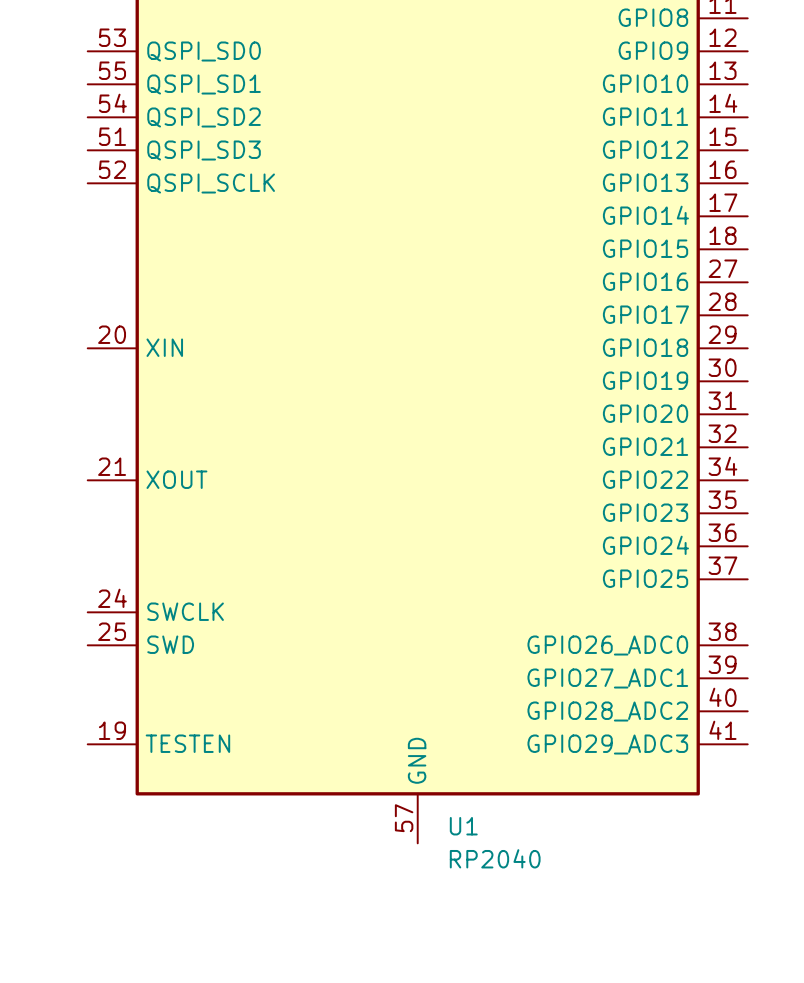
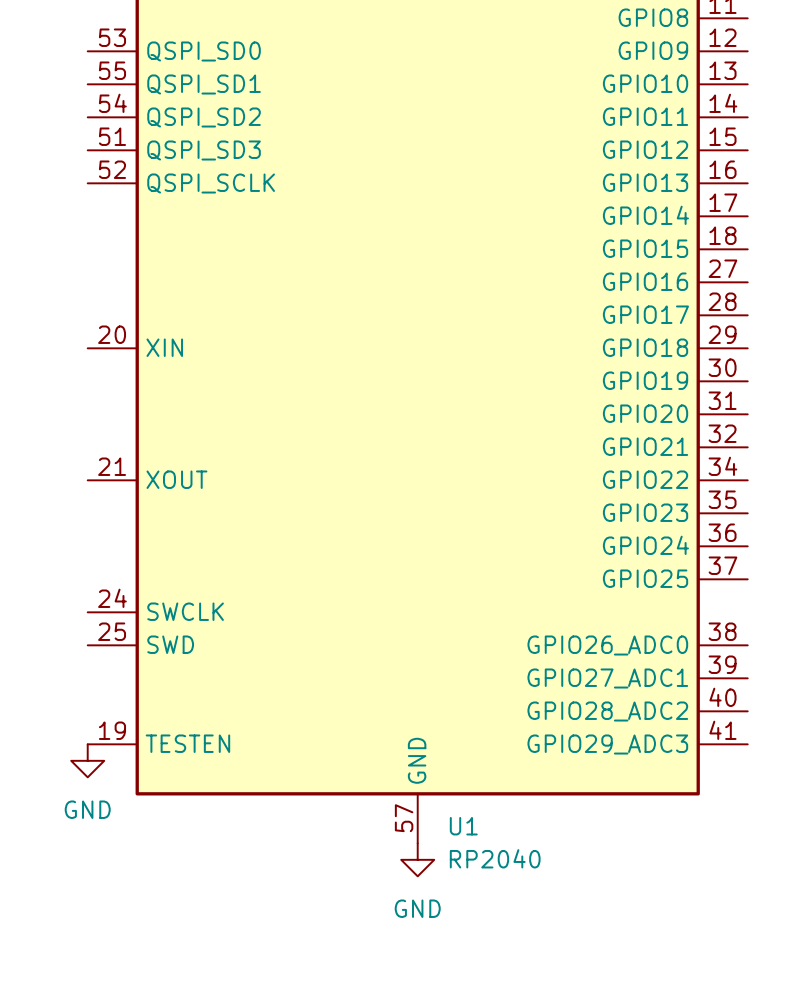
power symbol: none -> GND (87, 760)
power symbol: none -> GND (417, 859)

